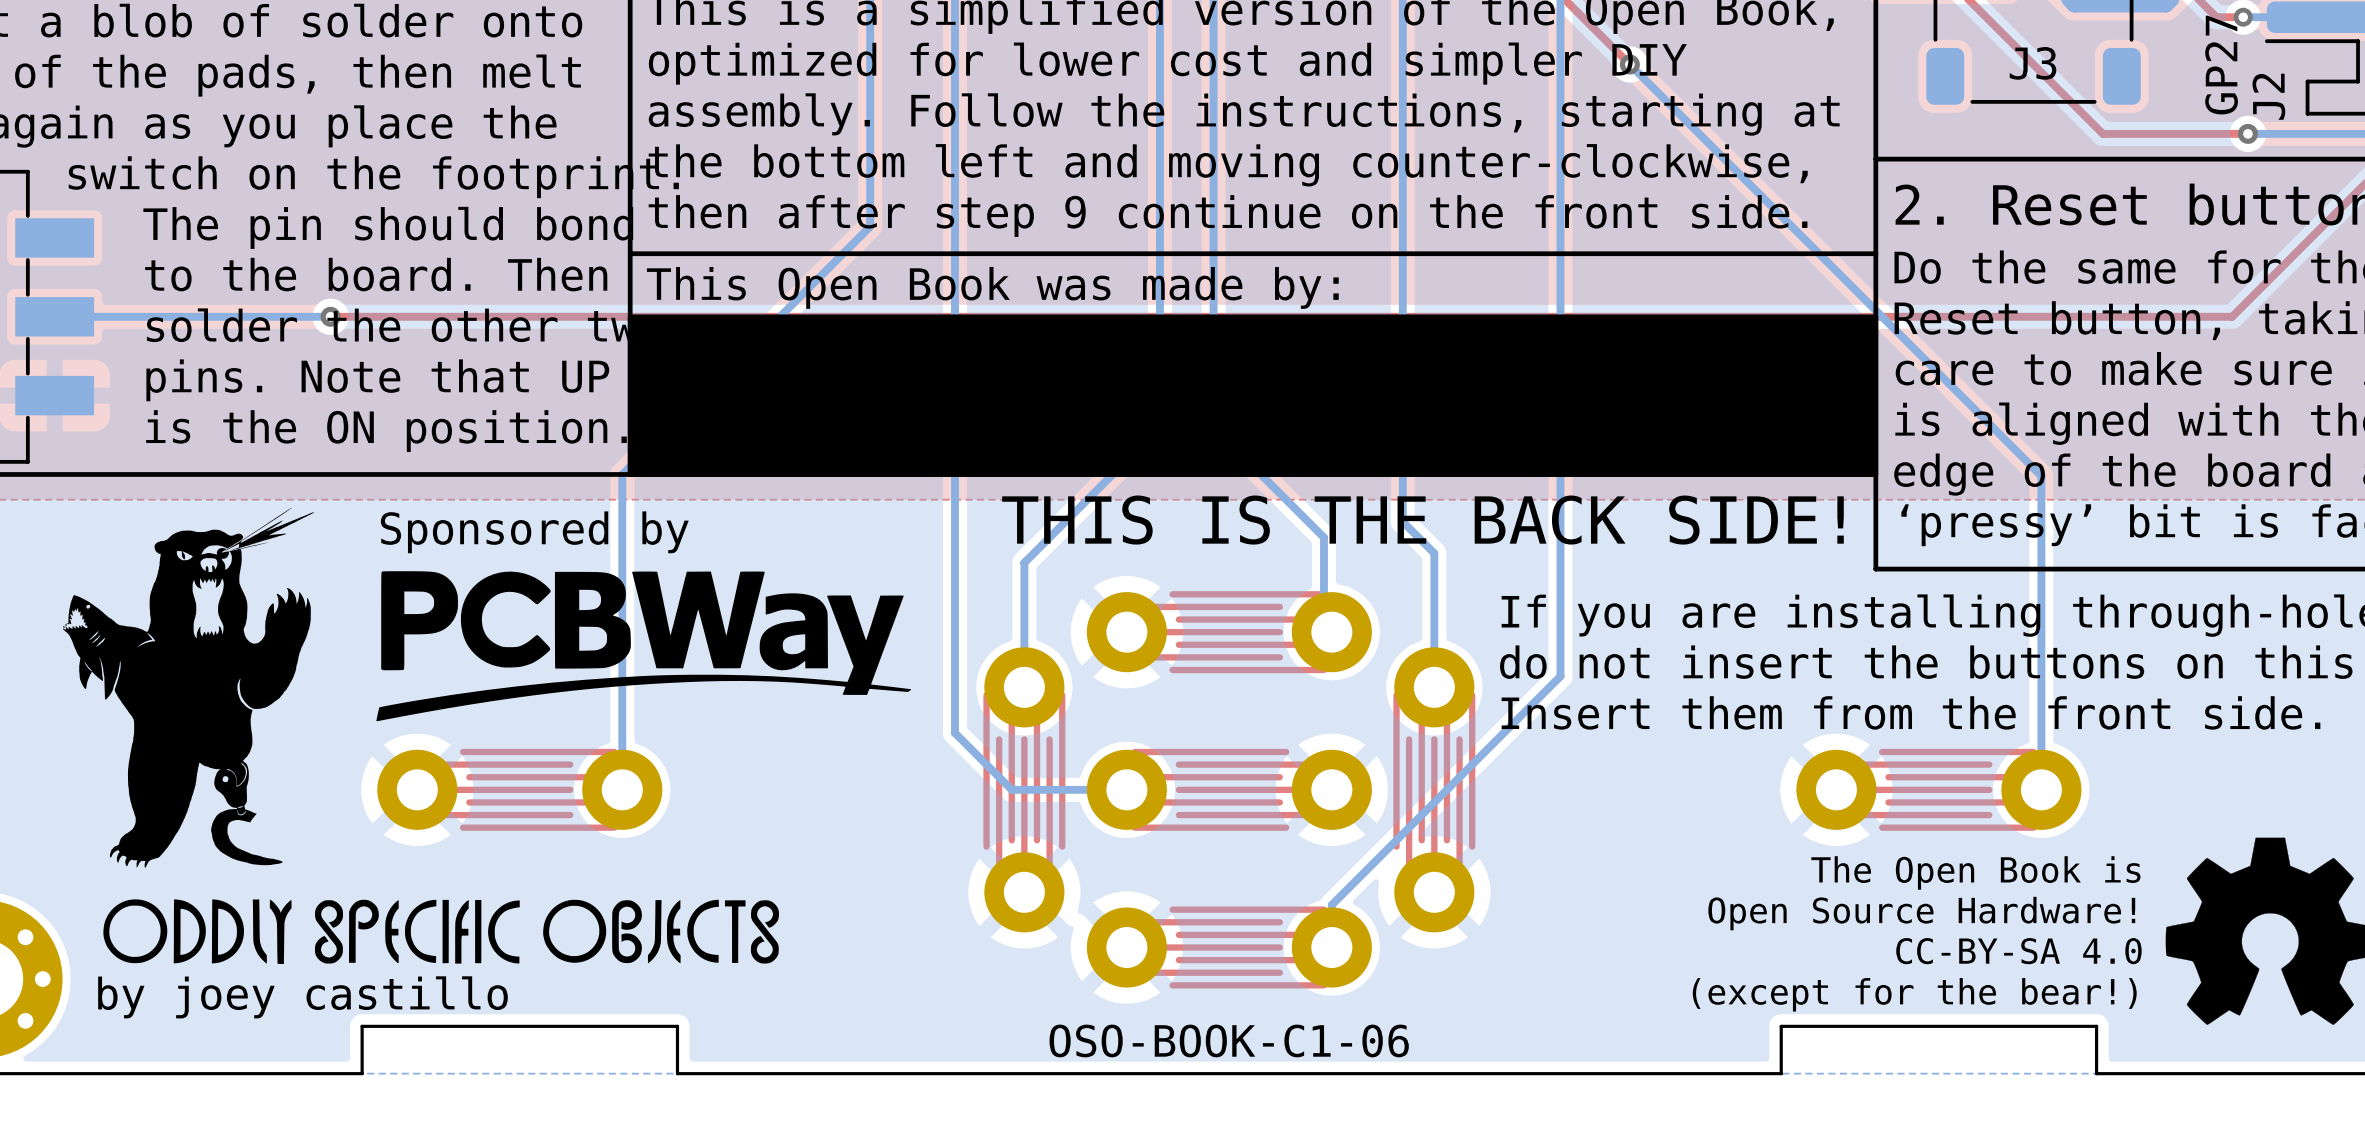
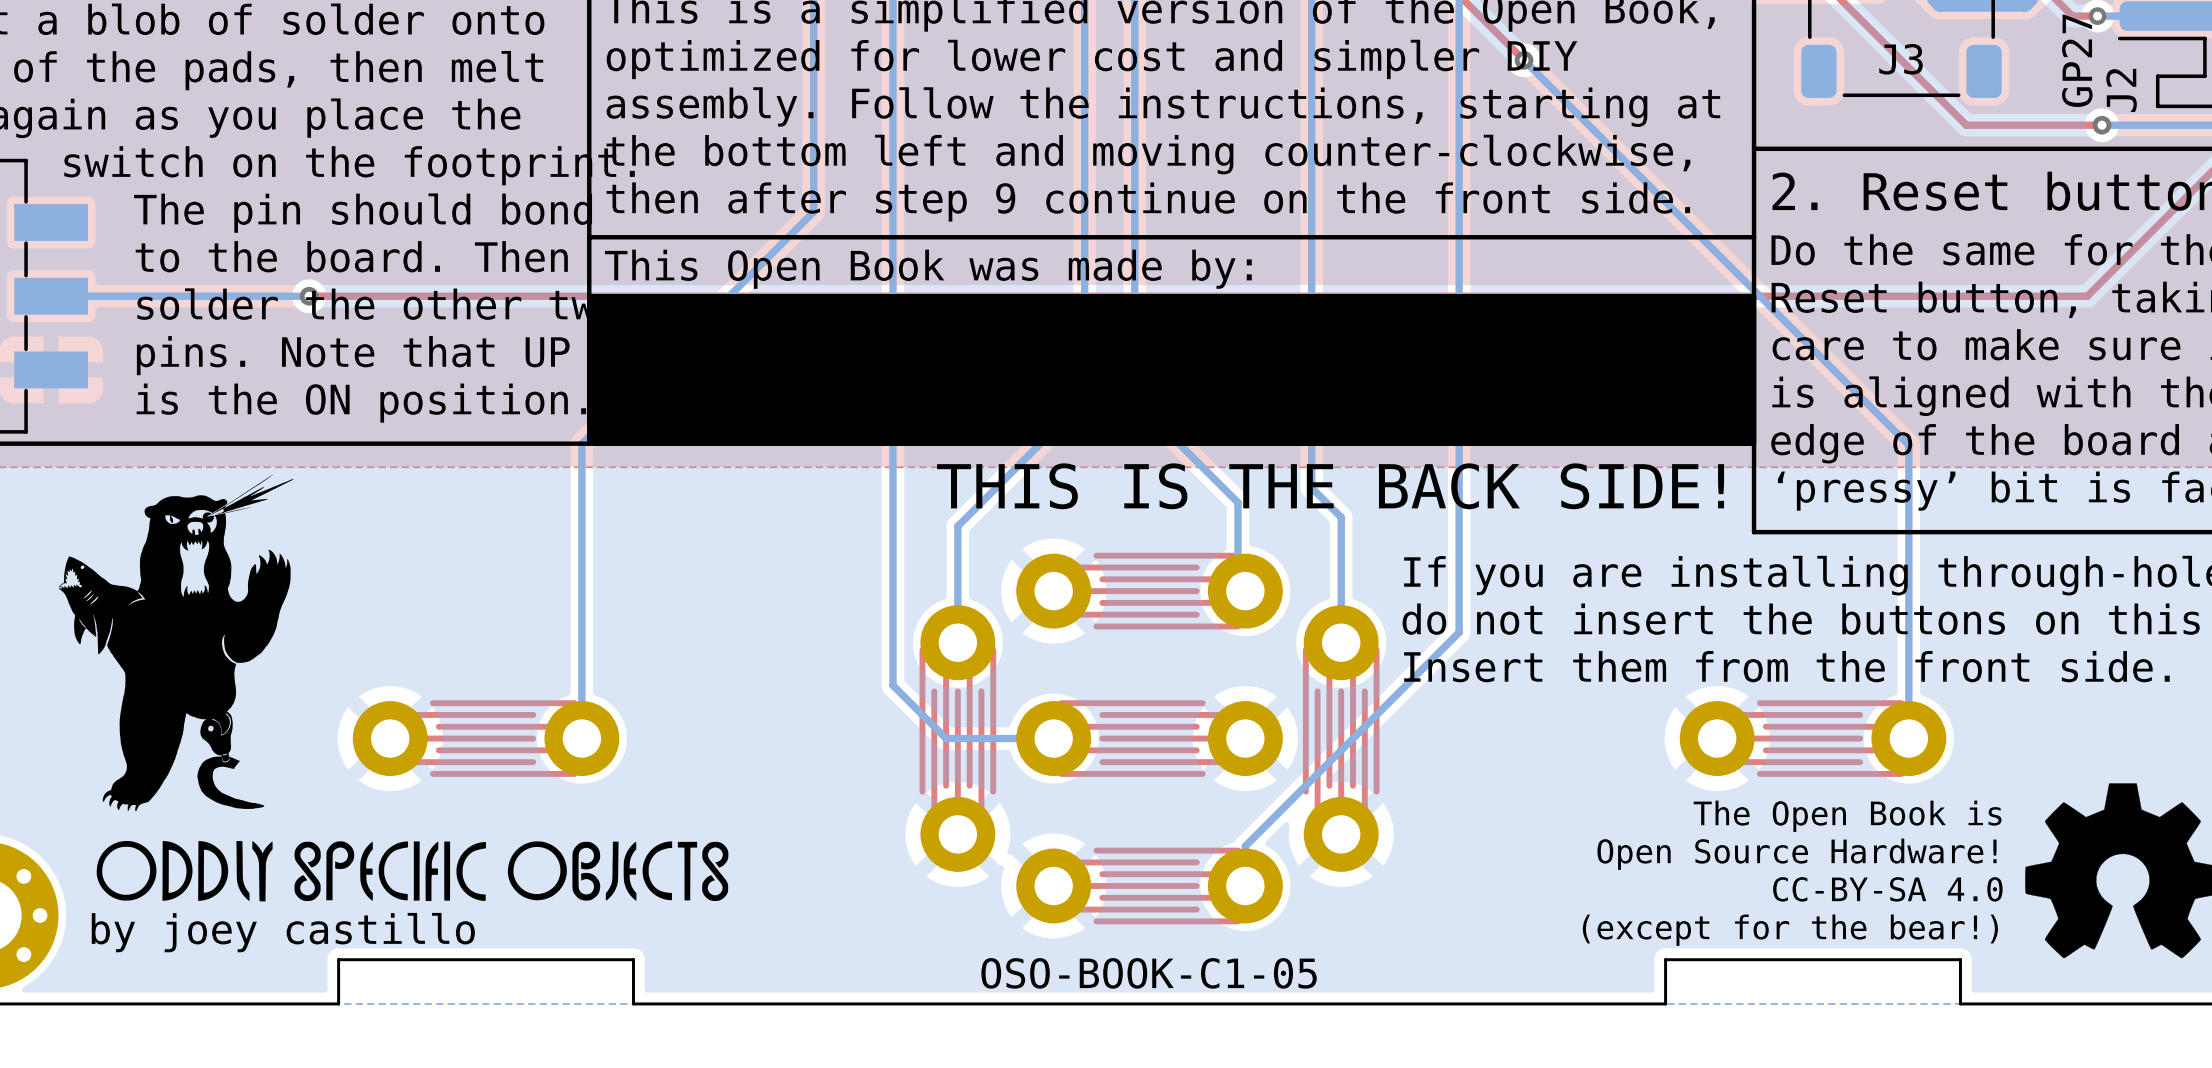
text: Sponsored by (534, 532) -> none
drawing: [376, 571, 912, 722] -> none
text: OSO-BOOK-C1-06 (1229, 1040) -> OSO-BOOK-C1-05 (1149, 973)

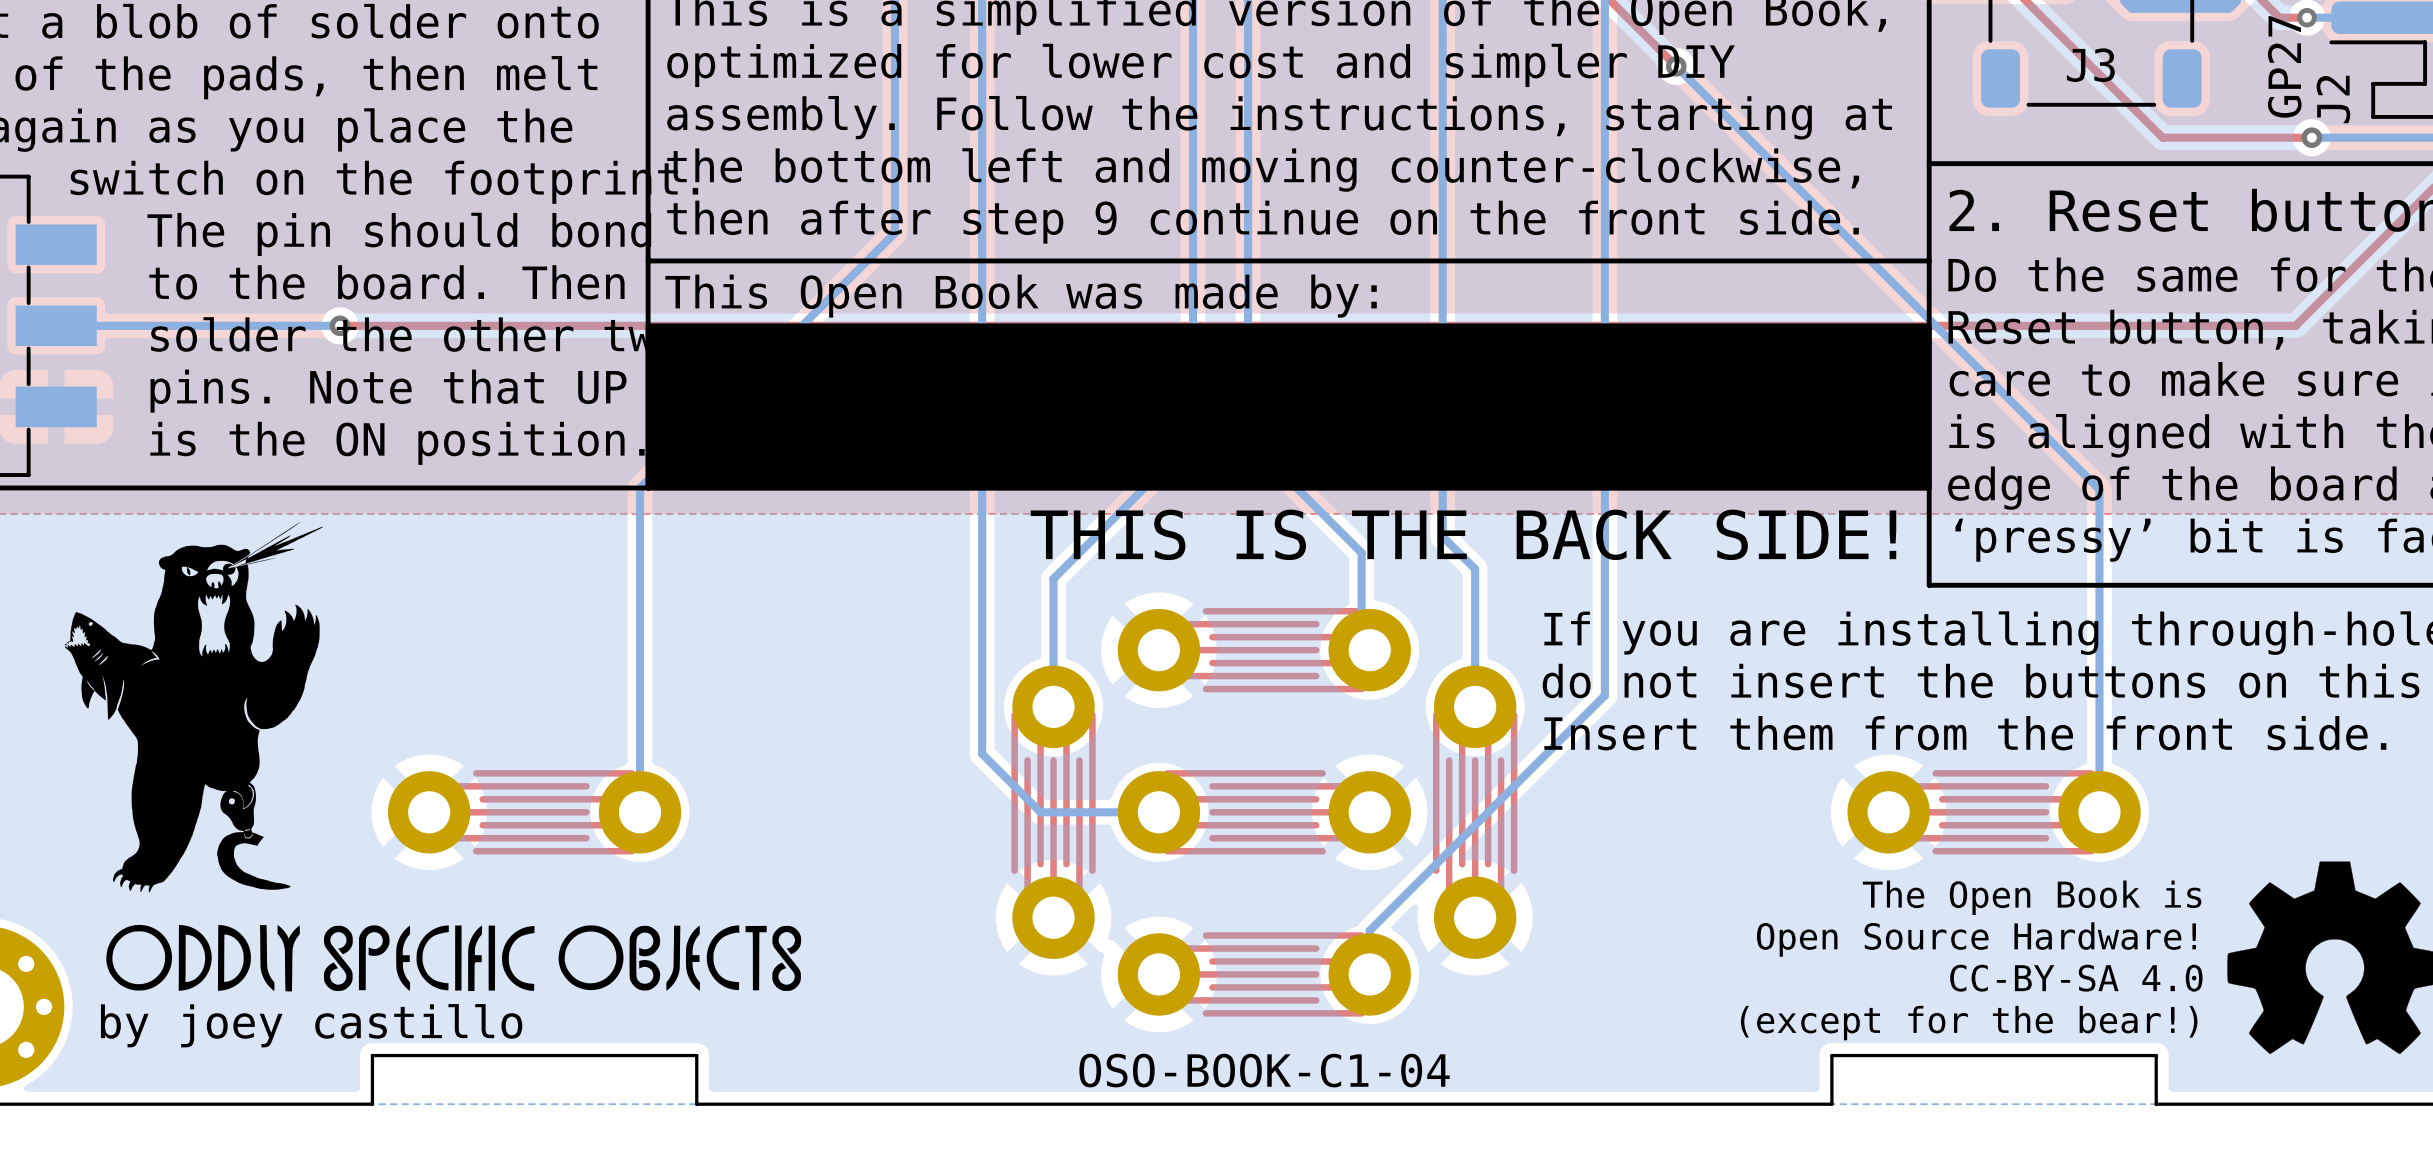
text: OSO-BOOK-C1-05 (1149, 973) -> OSO-BOOK-C1-04 (1264, 1070)

